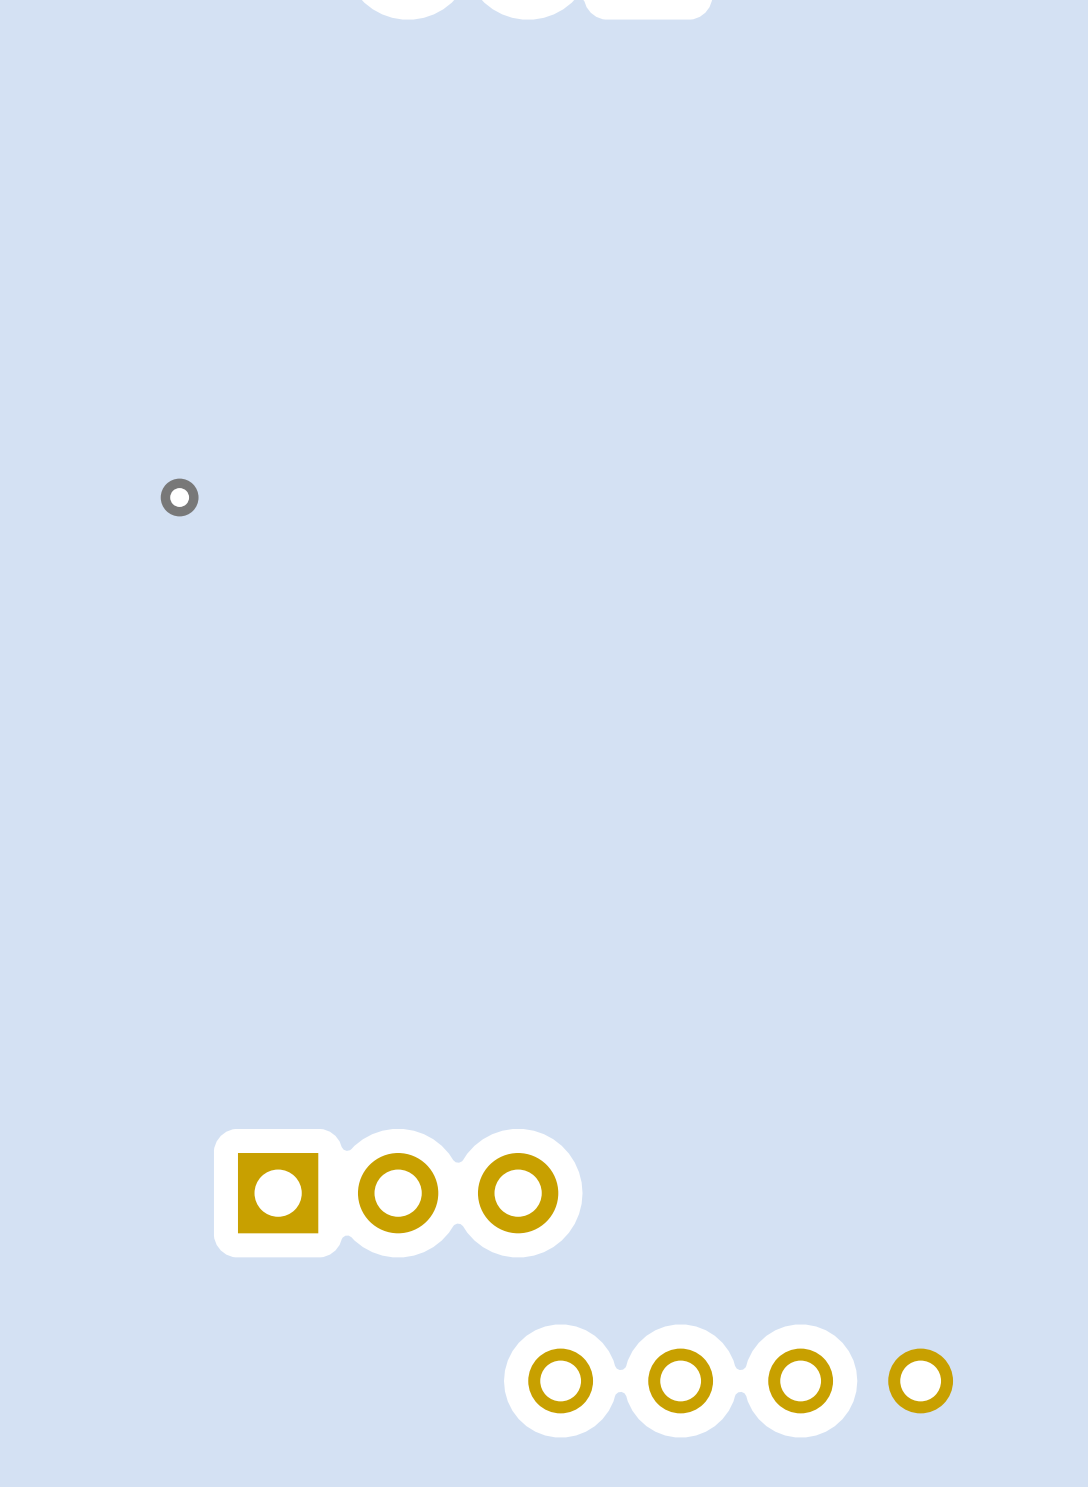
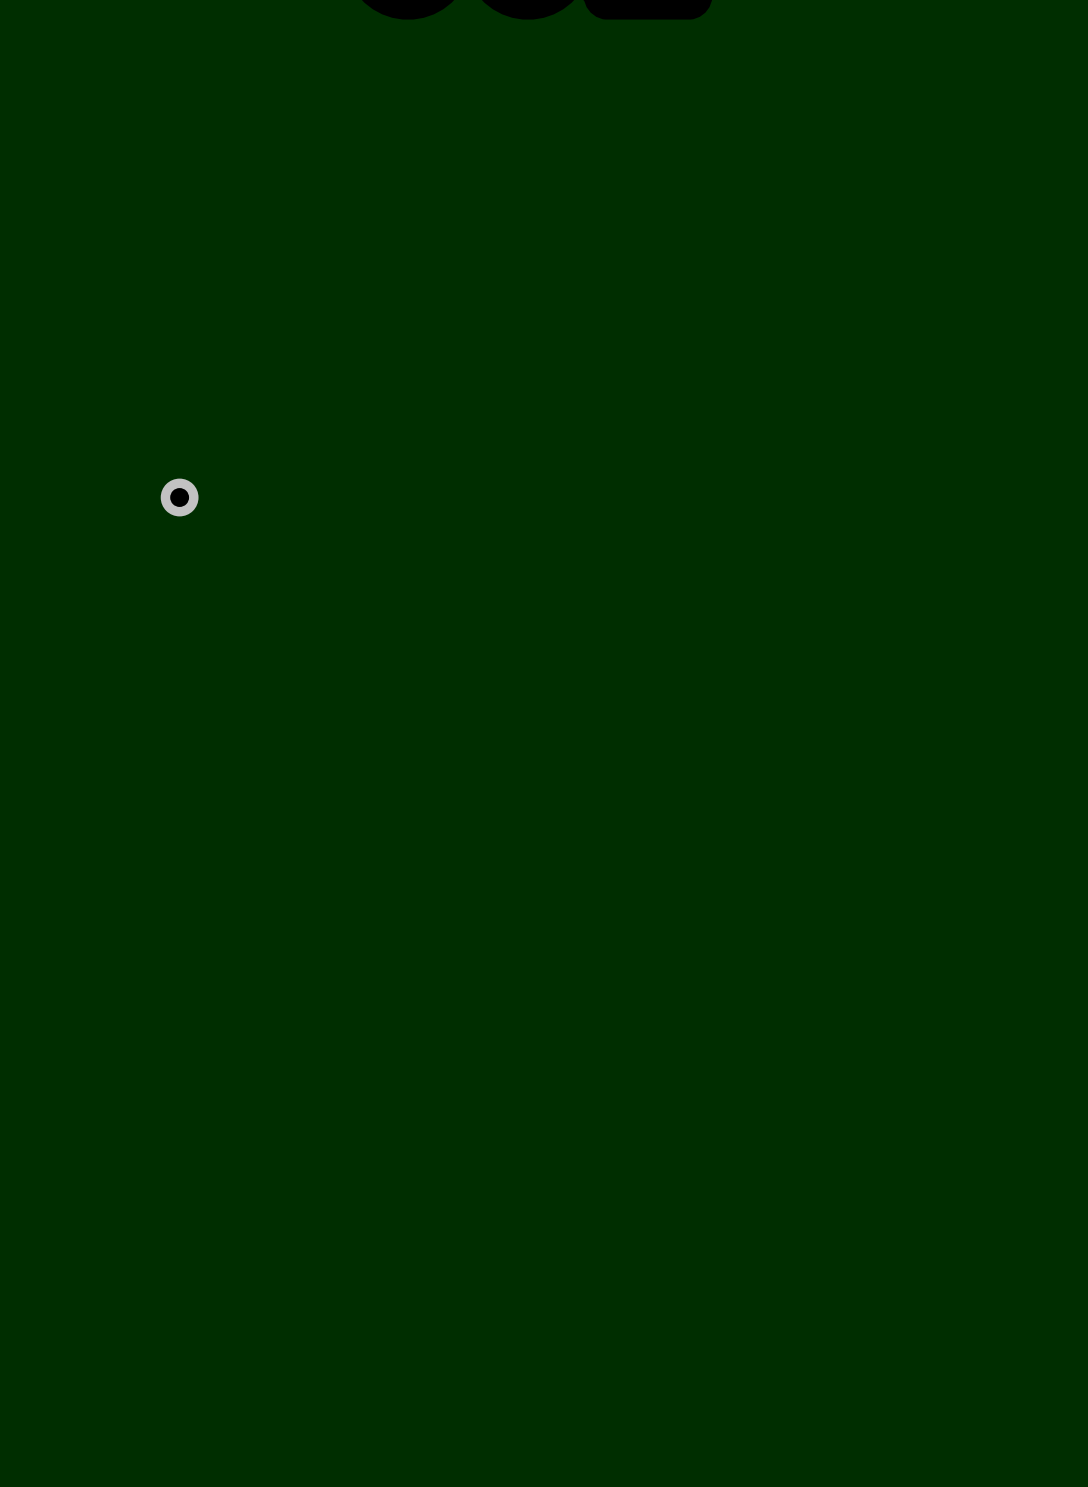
part: (398, 1193) -> none
part: (740, 1380) -> none

